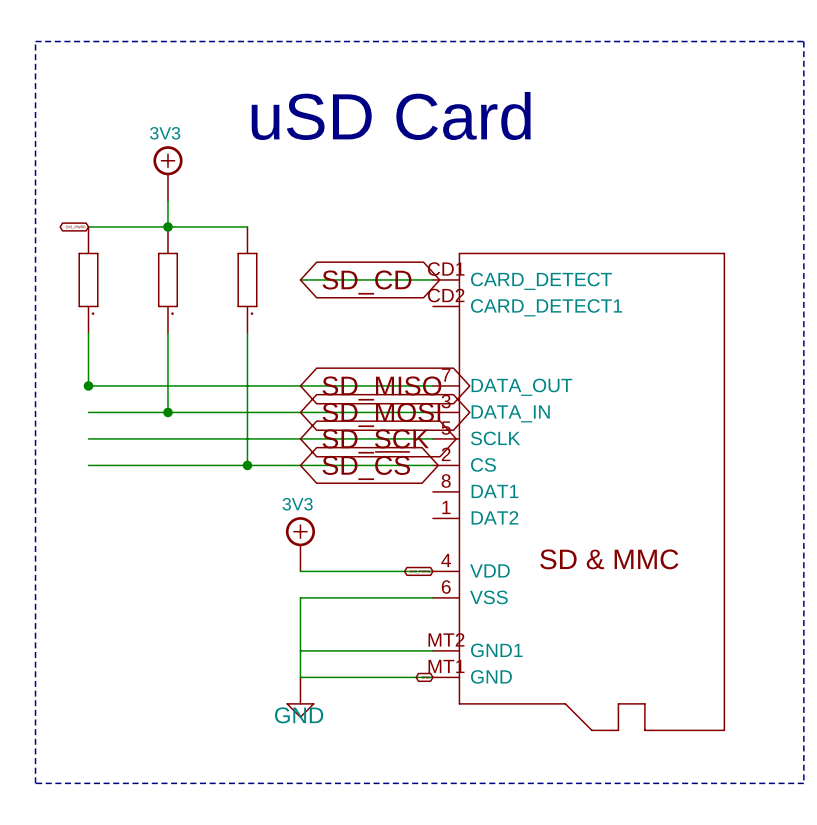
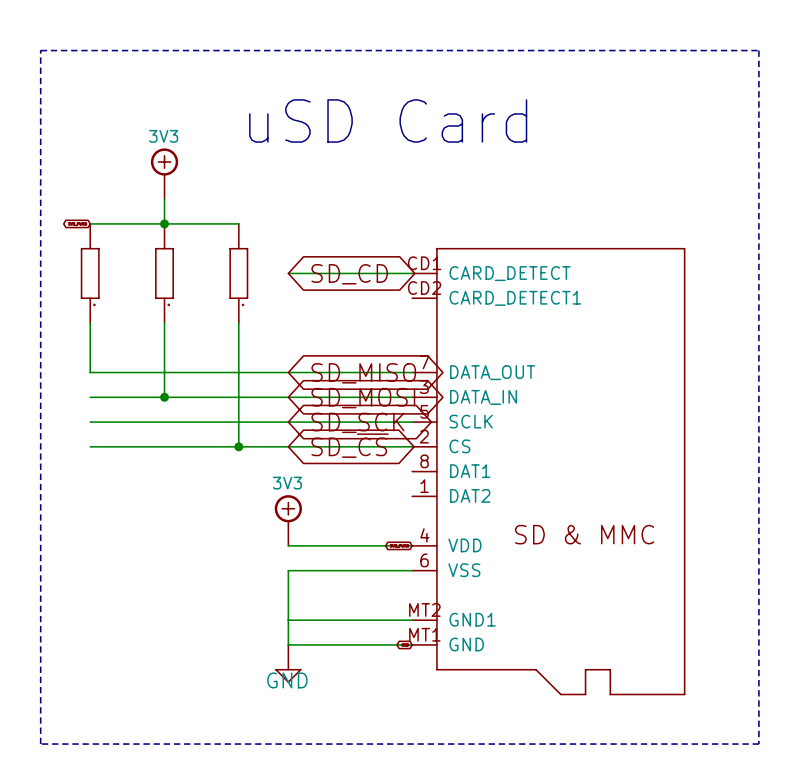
junction: (88, 385) -> none

